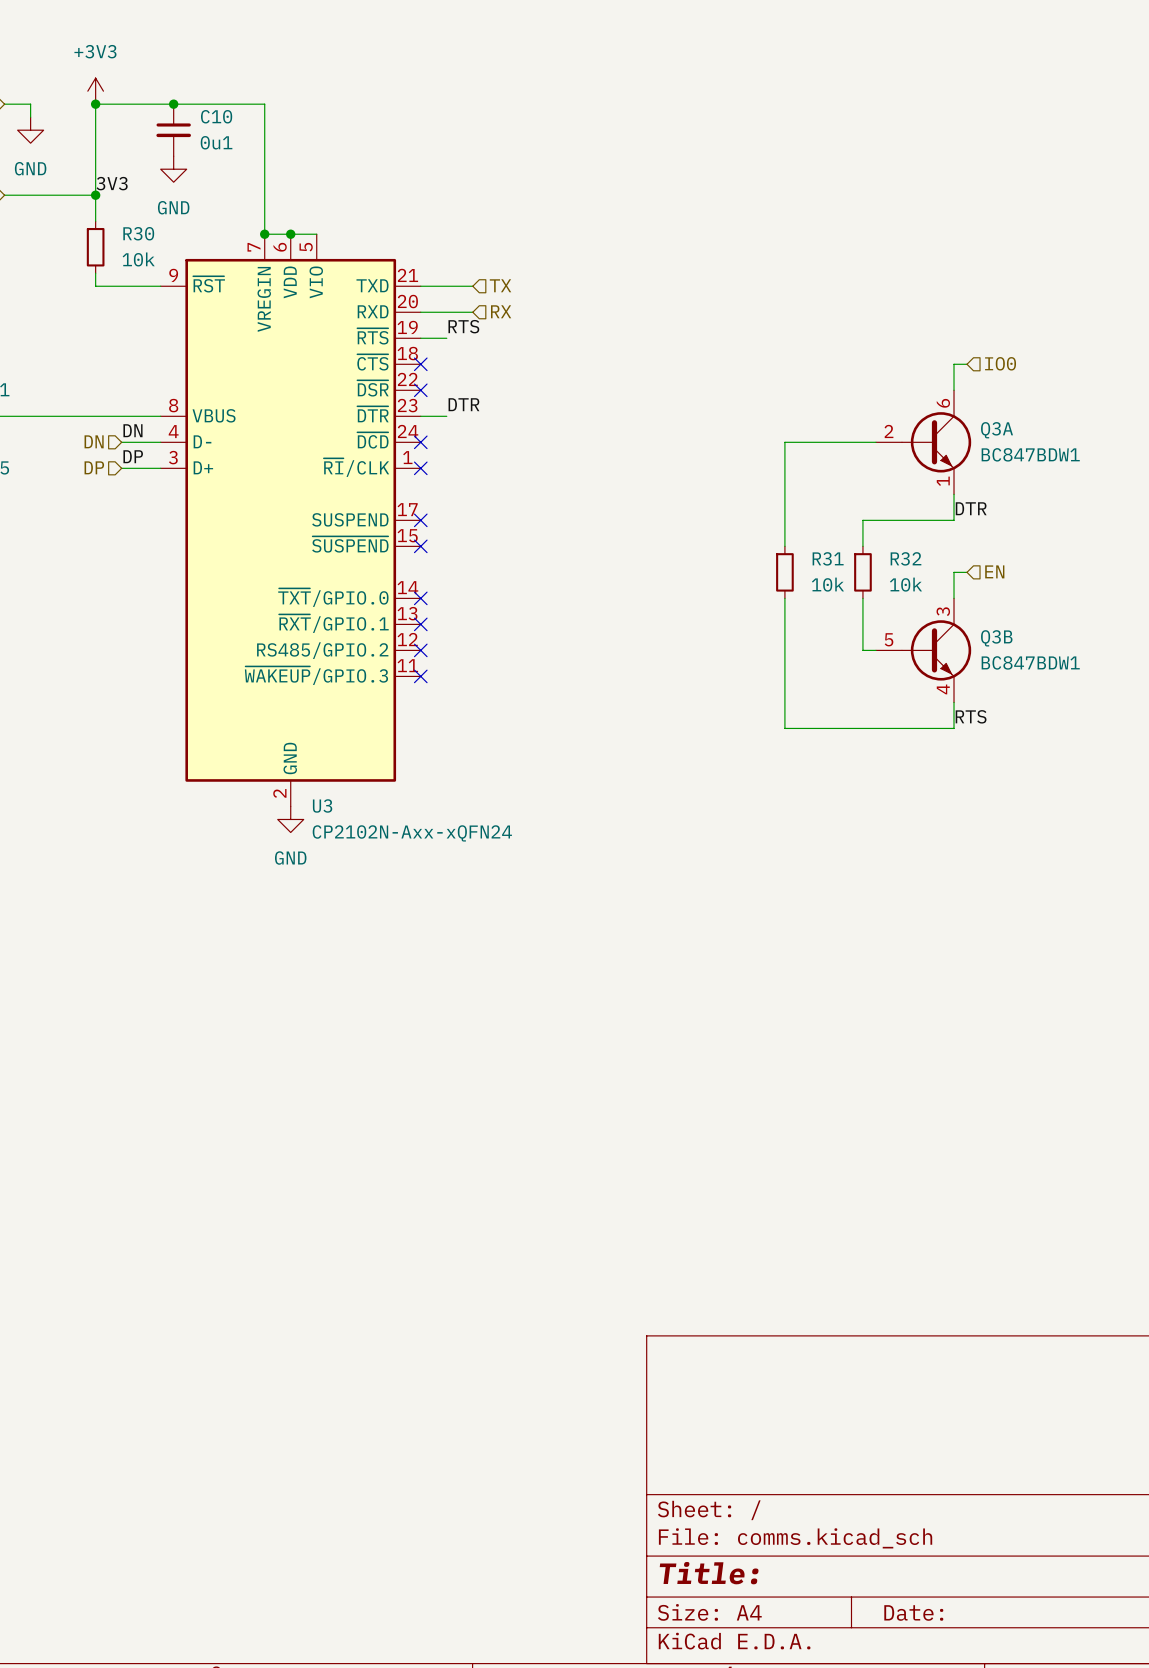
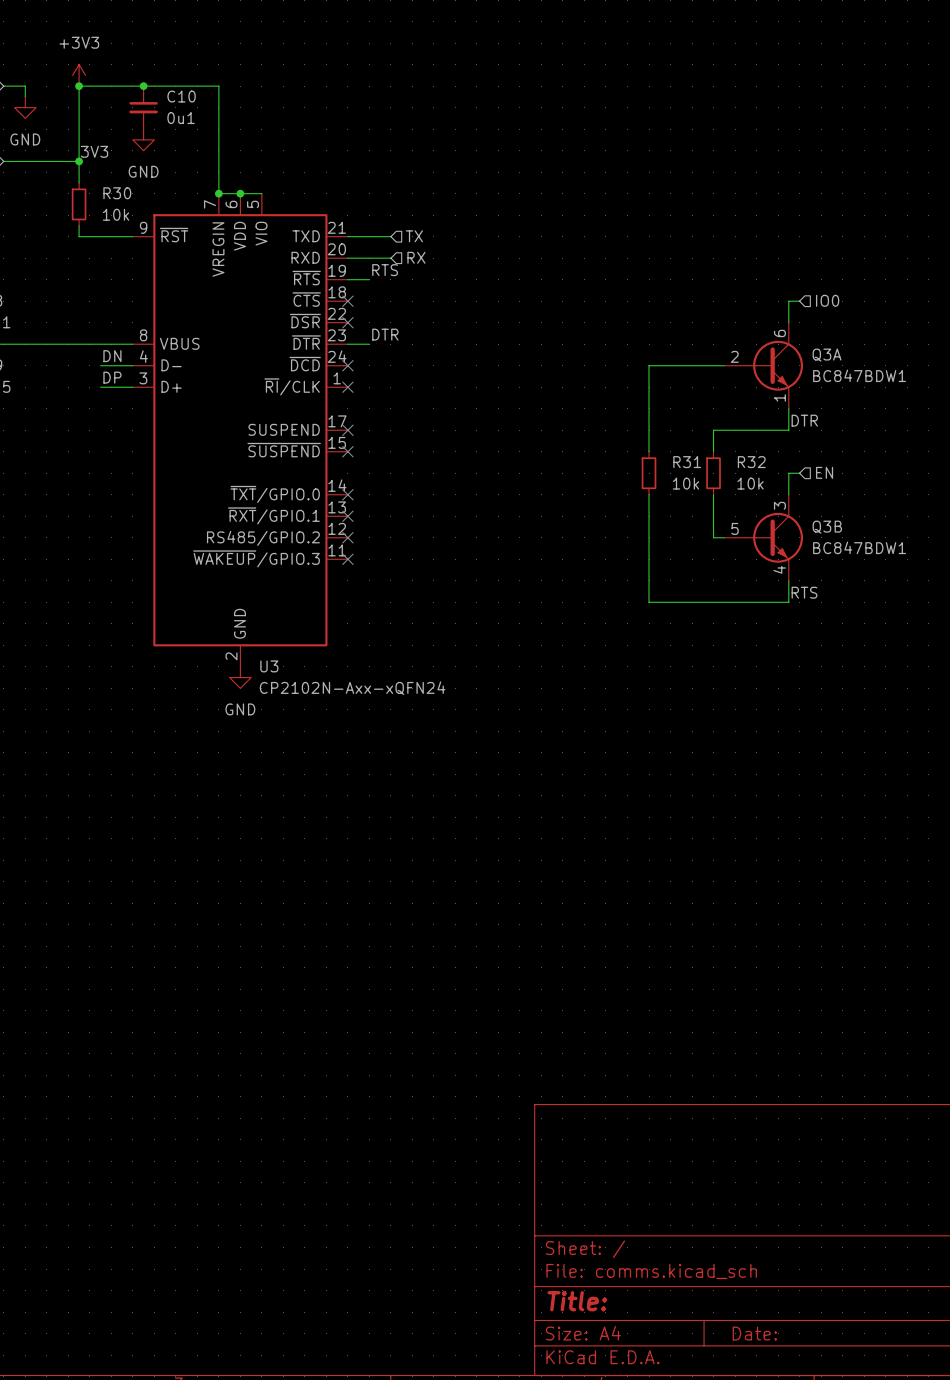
hierarchical label: DN (94, 441) -> none
hierarchical label: DP (94, 467) -> none

